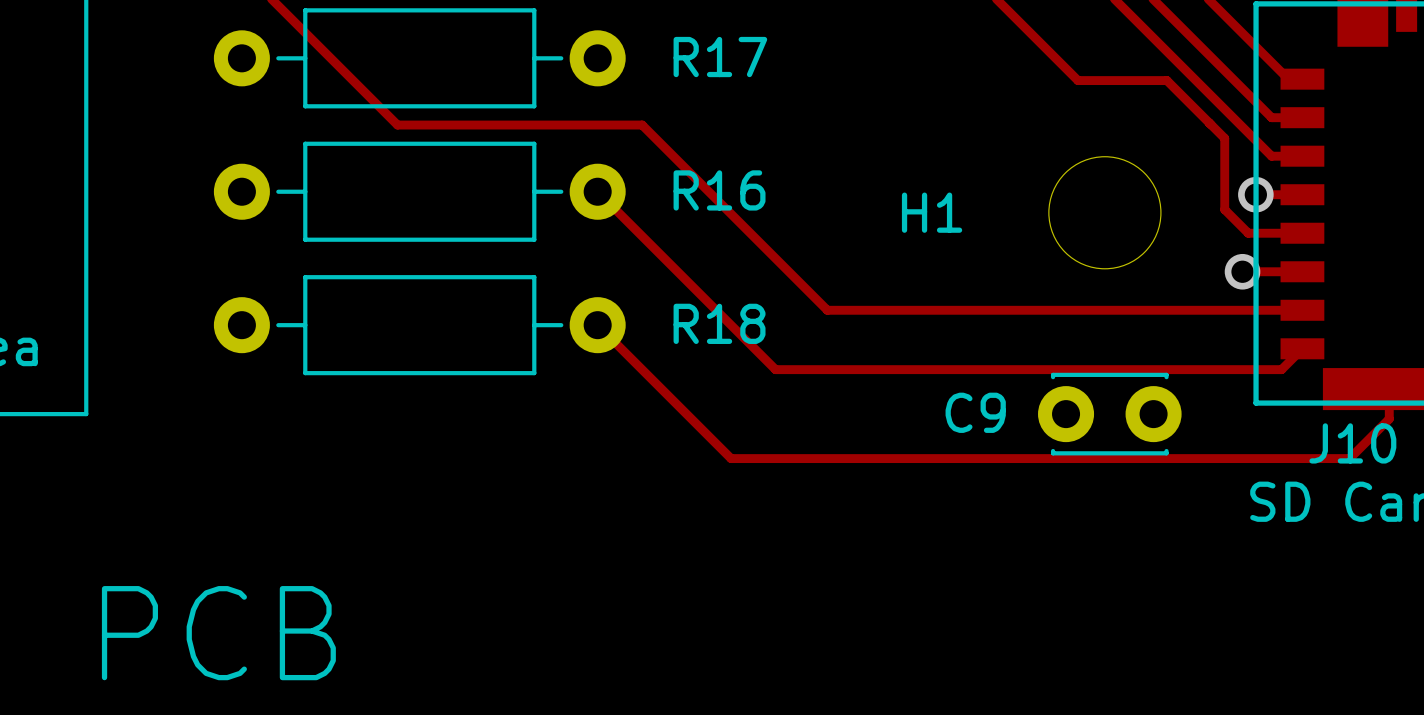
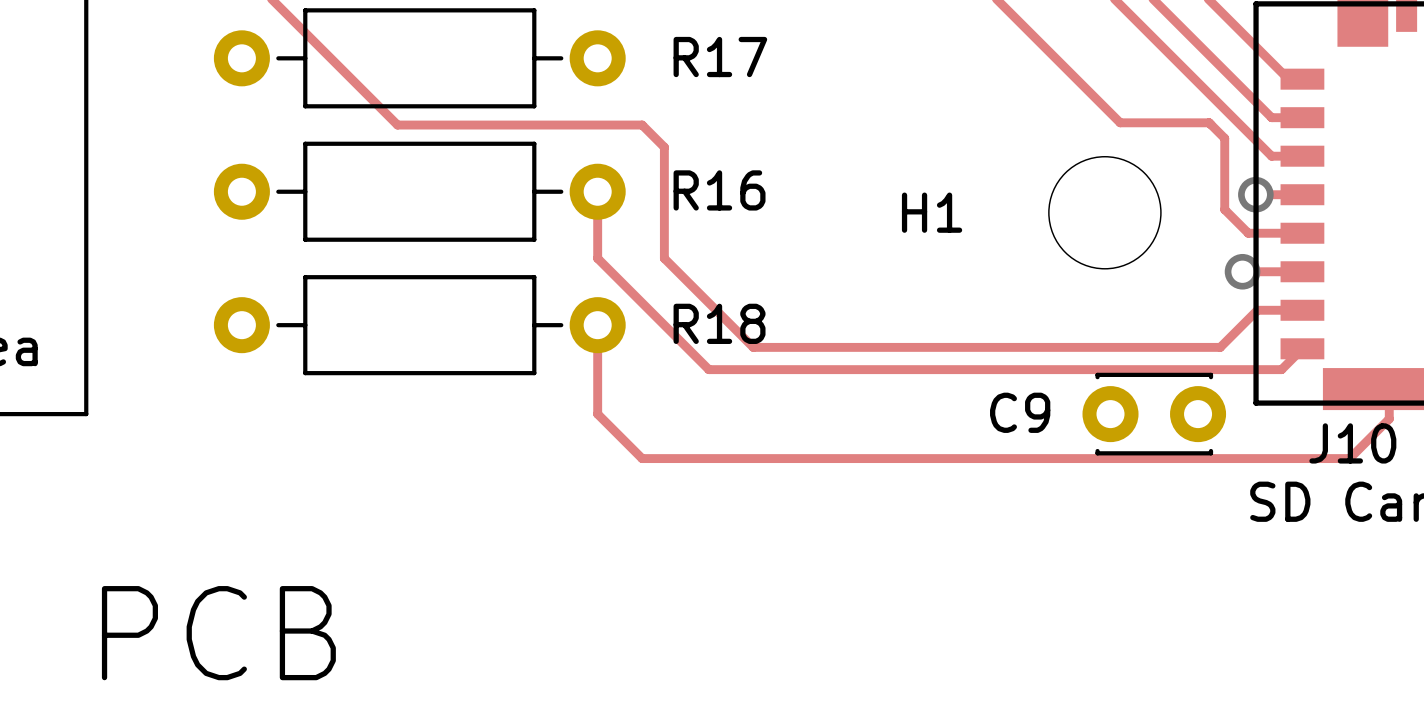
track: (1077, 80) (1166, 80) (1209, 122) -> (1077, 80) (1120, 122) (1209, 122)
track: (664, 147) (827, 310) (1257, 310) -> (753, 347) (1220, 347) (1257, 310)
track: (597, 191) (664, 258) -> (664, 147) (664, 258)
track: (597, 325) (731, 458) -> (597, 325) (597, 414) (642, 458) (731, 458)
track: (753, 347) (775, 369) -> (597, 191) (597, 258) (708, 369) (775, 369)
C9 position: (1109, 414) -> (1154, 414)

